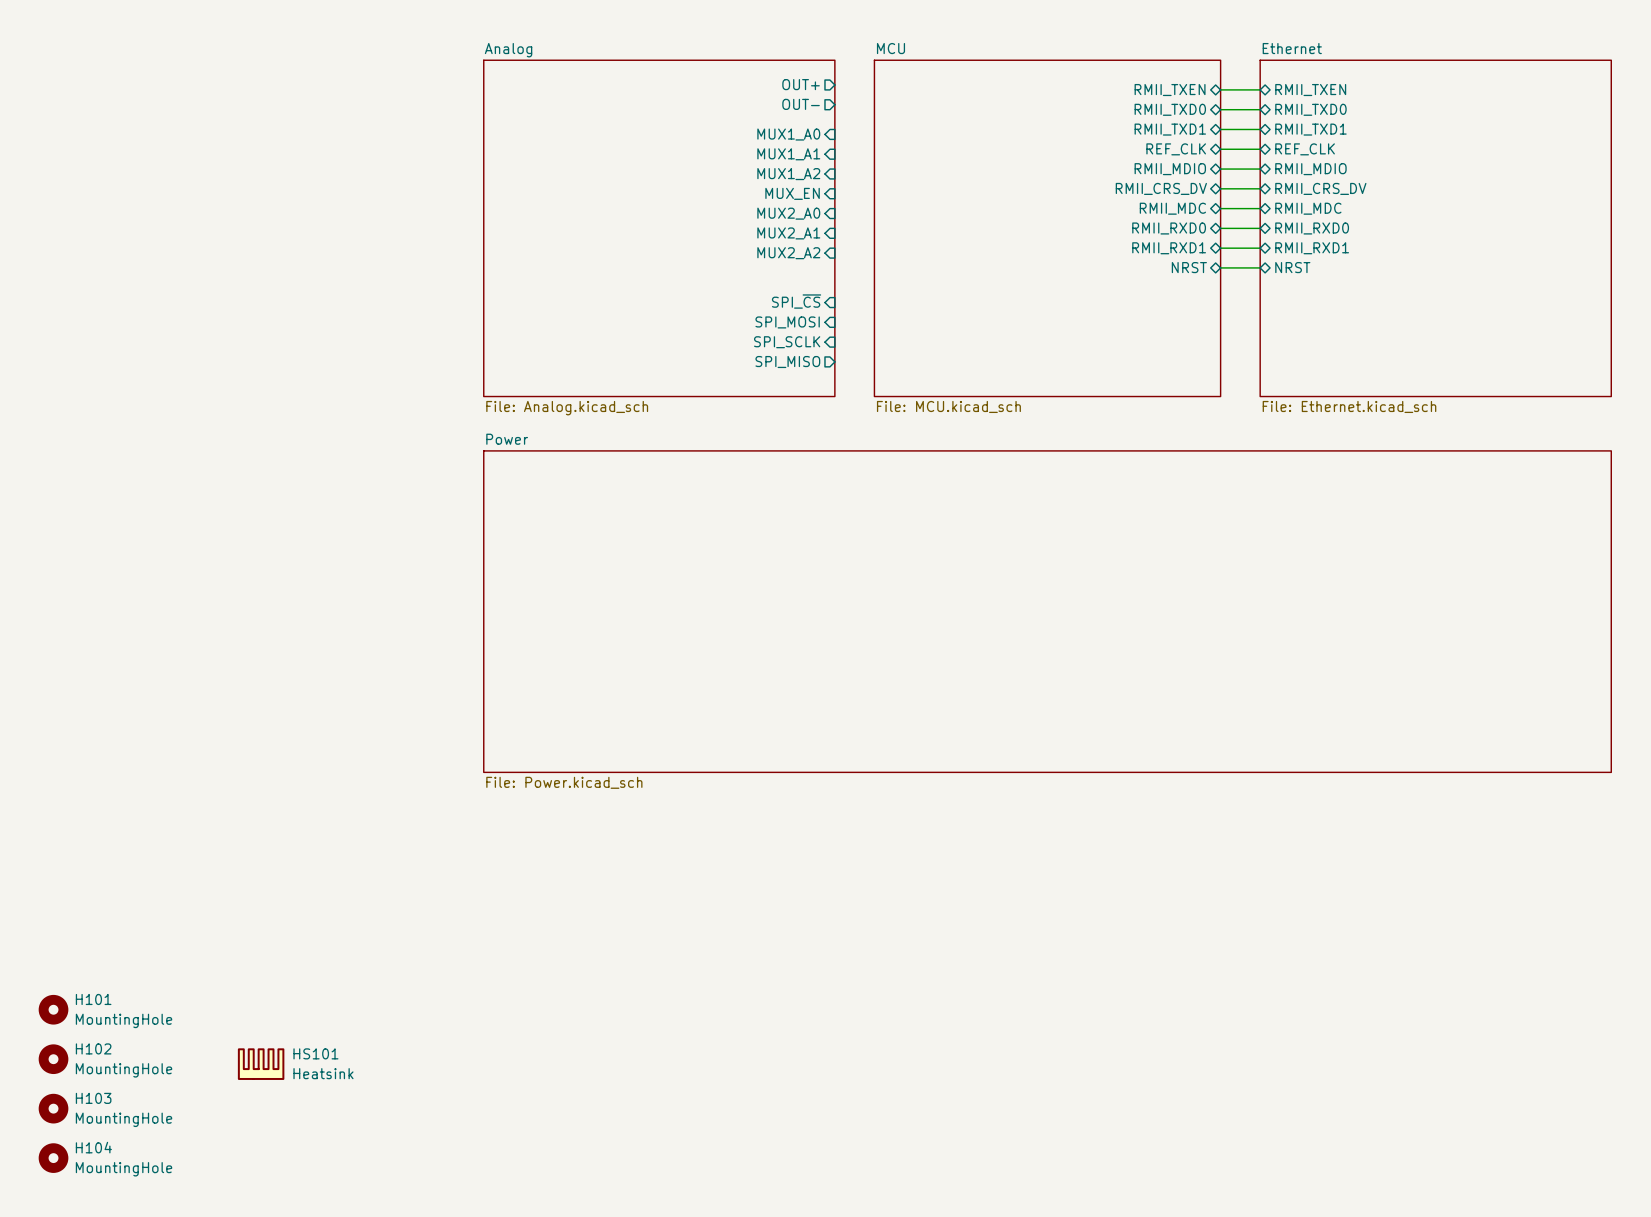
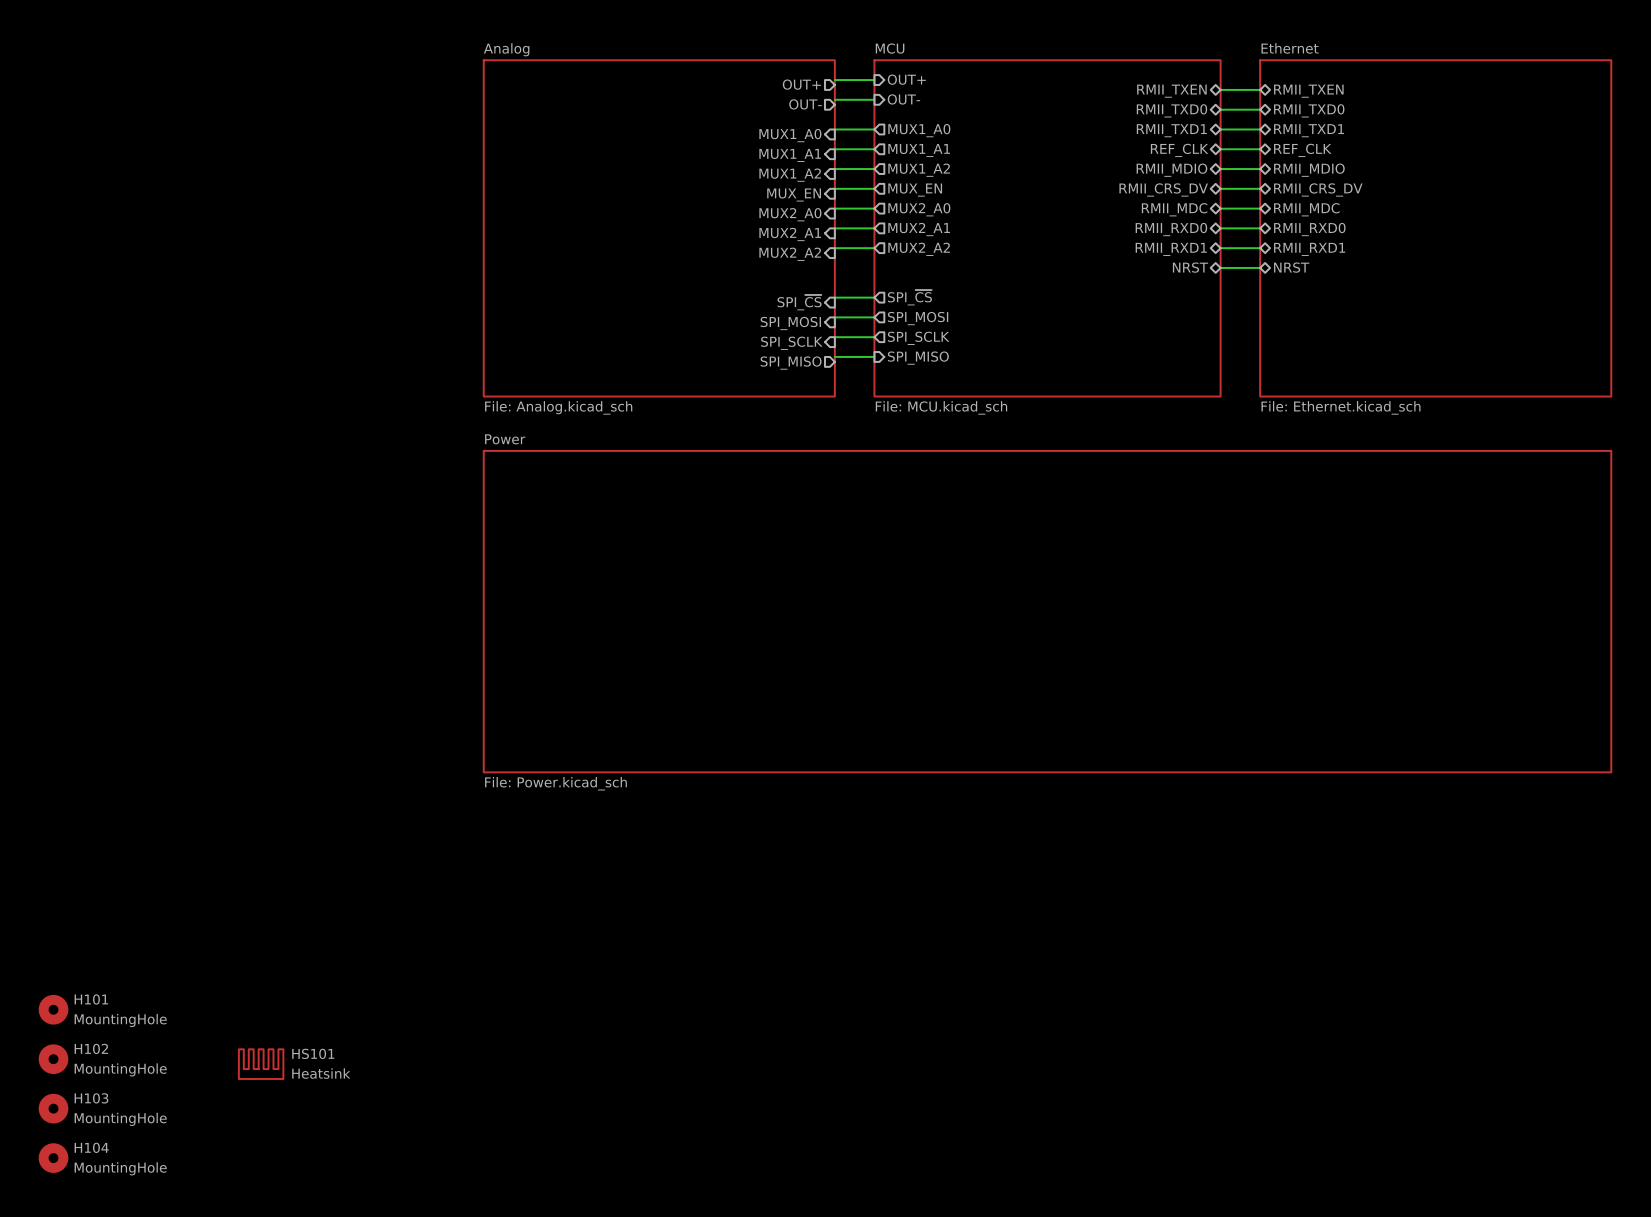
sheet pin: none -> OUT+ (906, 79)
wire: none -> (834, 80) (874, 80)
wire: none -> (834, 99) (874, 99)
sheet pin: none -> OUT- (903, 99)
wire: none -> (834, 129) (874, 129)
sheet pin: none -> MUX1_A0 (919, 130)
wire: none -> (834, 149) (874, 149)
sheet pin: none -> MUX1_A1 (919, 150)
wire: none -> (834, 169) (874, 169)
sheet pin: none -> MUX1_A2 (919, 170)
wire: none -> (834, 188) (874, 188)
sheet pin: none -> MUX_EN (915, 190)
wire: none -> (834, 208) (874, 208)
sheet pin: none -> MUX2_A0 (919, 209)
wire: none -> (834, 228) (874, 228)
sheet pin: none -> MUX2_A1 (919, 229)
wire: none -> (834, 248) (874, 248)
sheet pin: none -> MUX2_A2 (919, 249)
sheet pin: none -> SPI_~{CS} (909, 297)
wire: none -> (834, 297) (874, 297)
wire: none -> (834, 317) (874, 317)
sheet pin: none -> SPI_MOSI (918, 318)
wire: none -> (834, 337) (874, 337)
sheet pin: none -> SPI_SCLK (918, 338)
wire: none -> (834, 356) (874, 356)
sheet pin: none -> SPI_MISO (918, 358)

